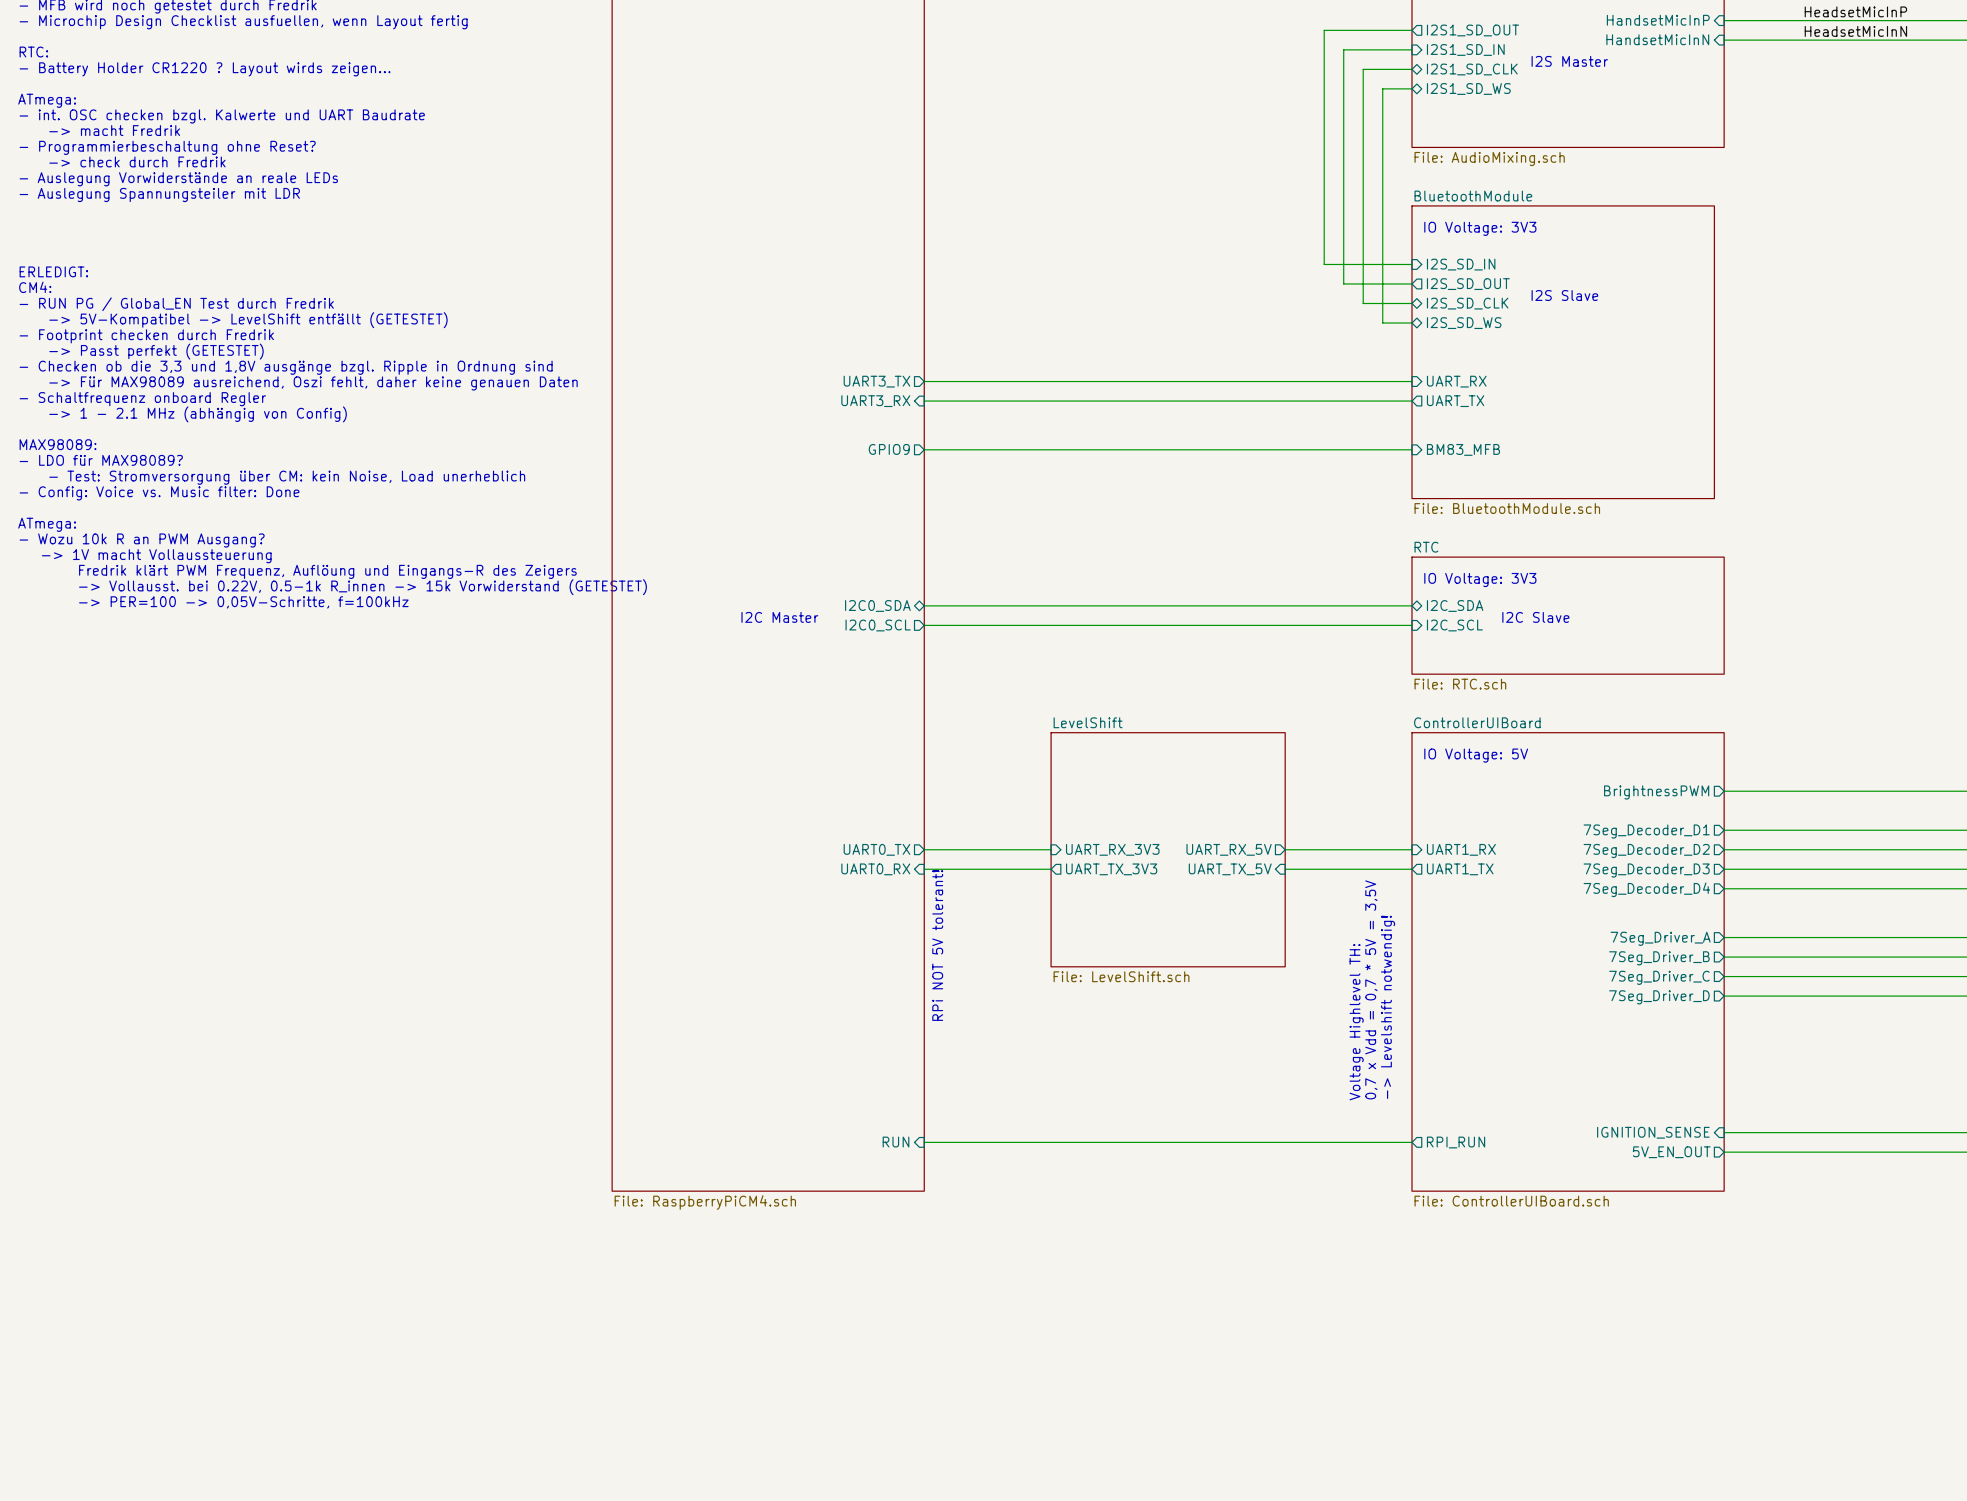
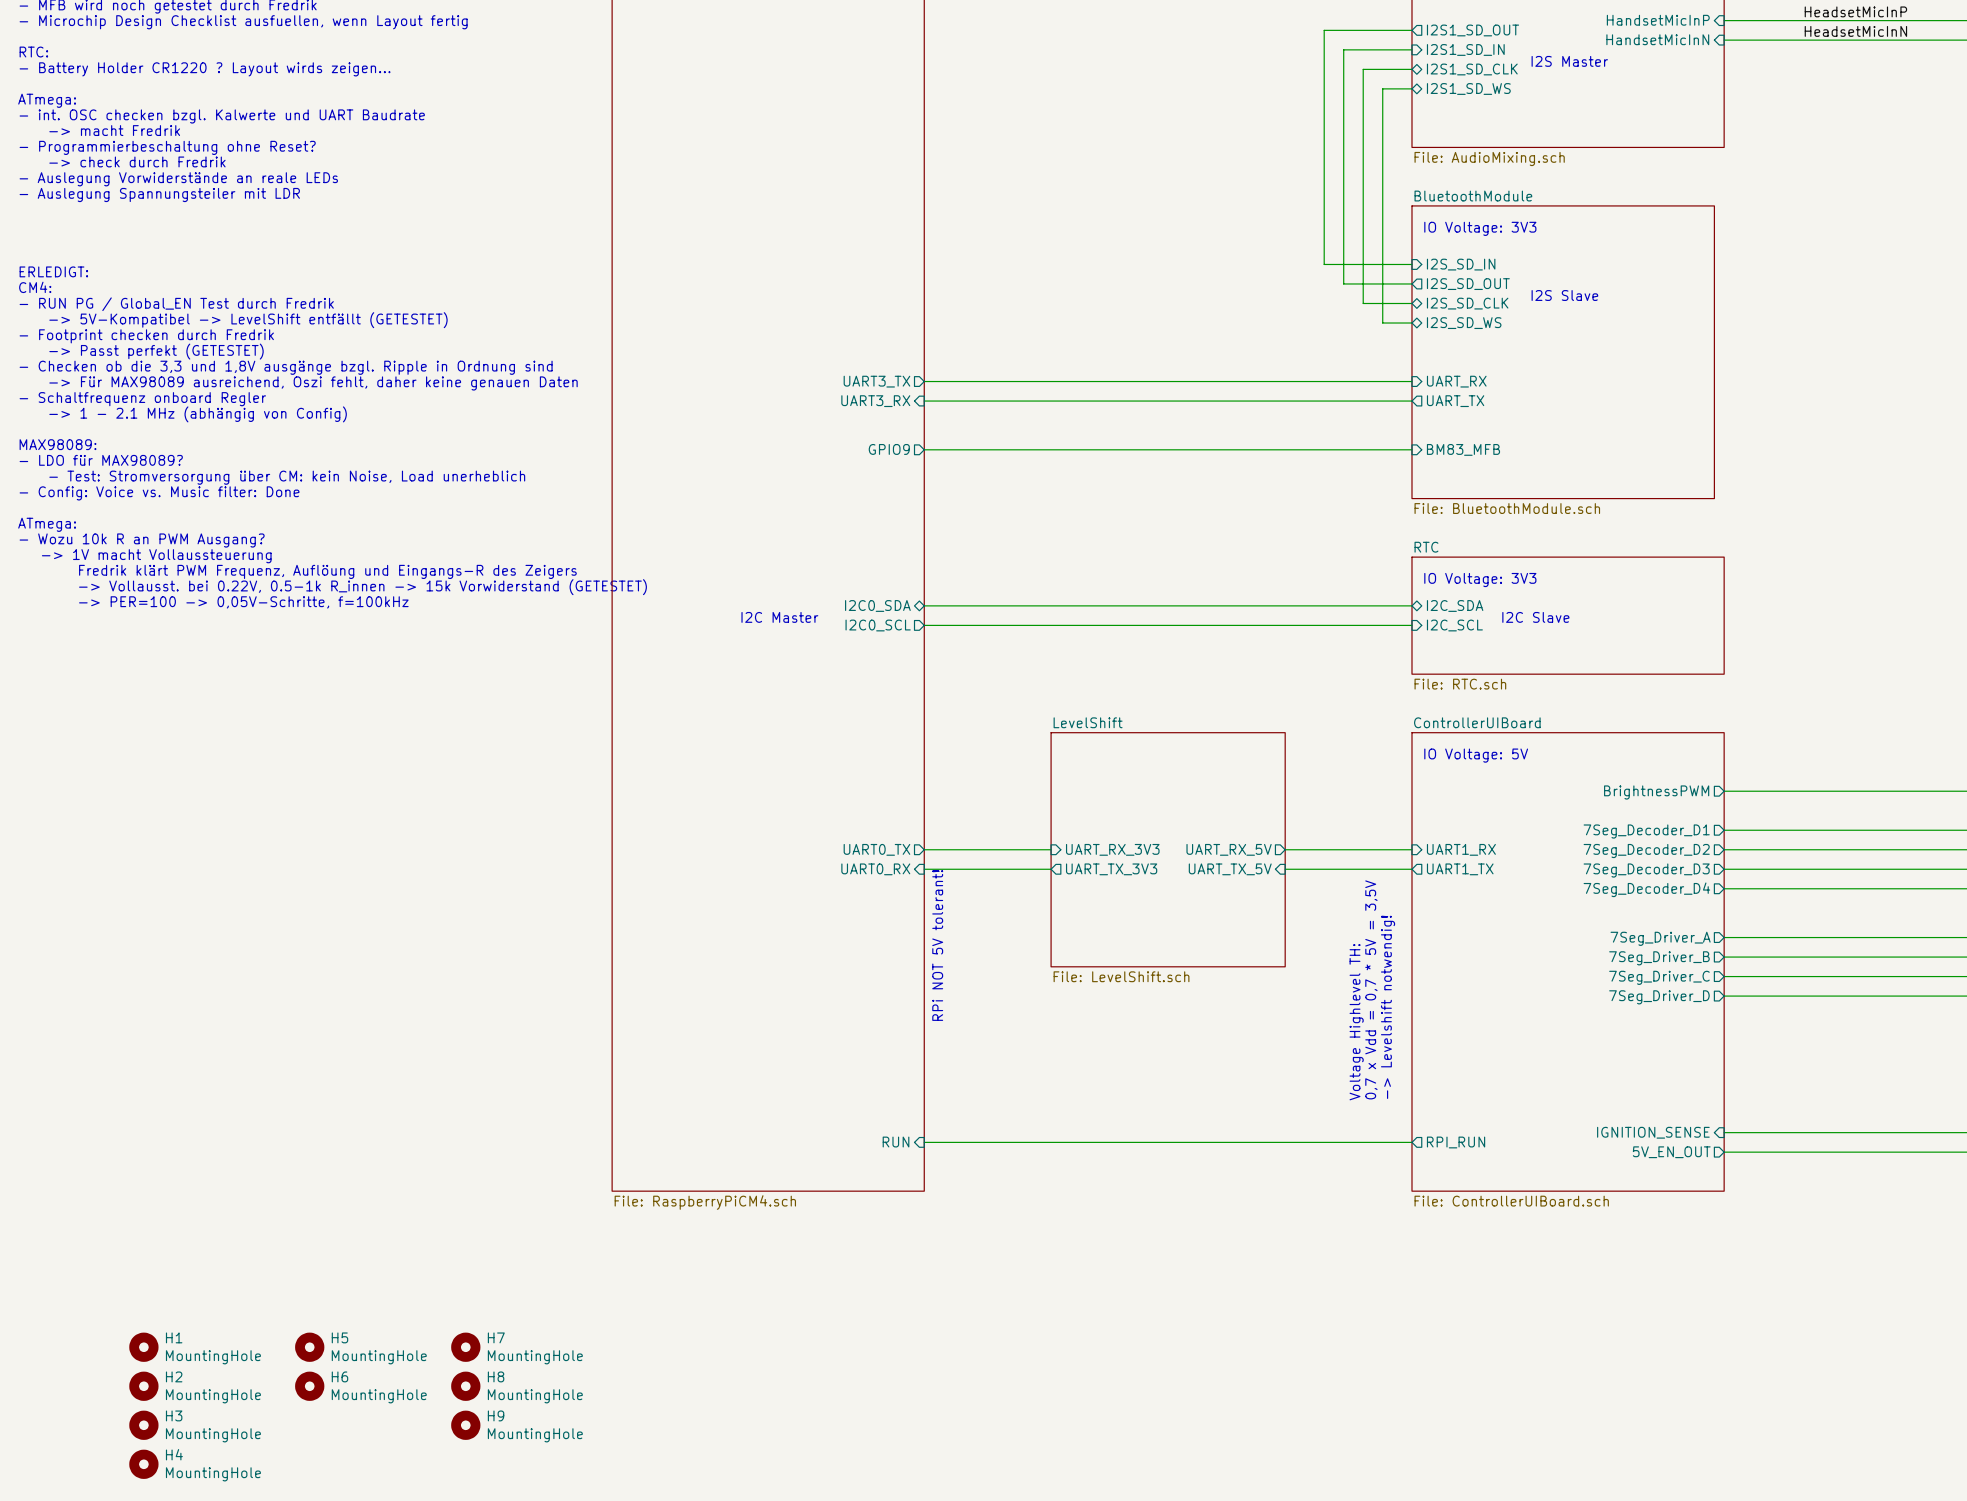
H1: none -> MountingHole (143, 1347)
H5: none -> MountingHole (309, 1347)
H7: none -> MountingHole (465, 1347)
H2: none -> MountingHole (143, 1386)
H6: none -> MountingHole (309, 1386)
H8: none -> MountingHole (465, 1386)
H3: none -> MountingHole (143, 1425)
H9: none -> MountingHole (465, 1425)
H4: none -> MountingHole (143, 1464)

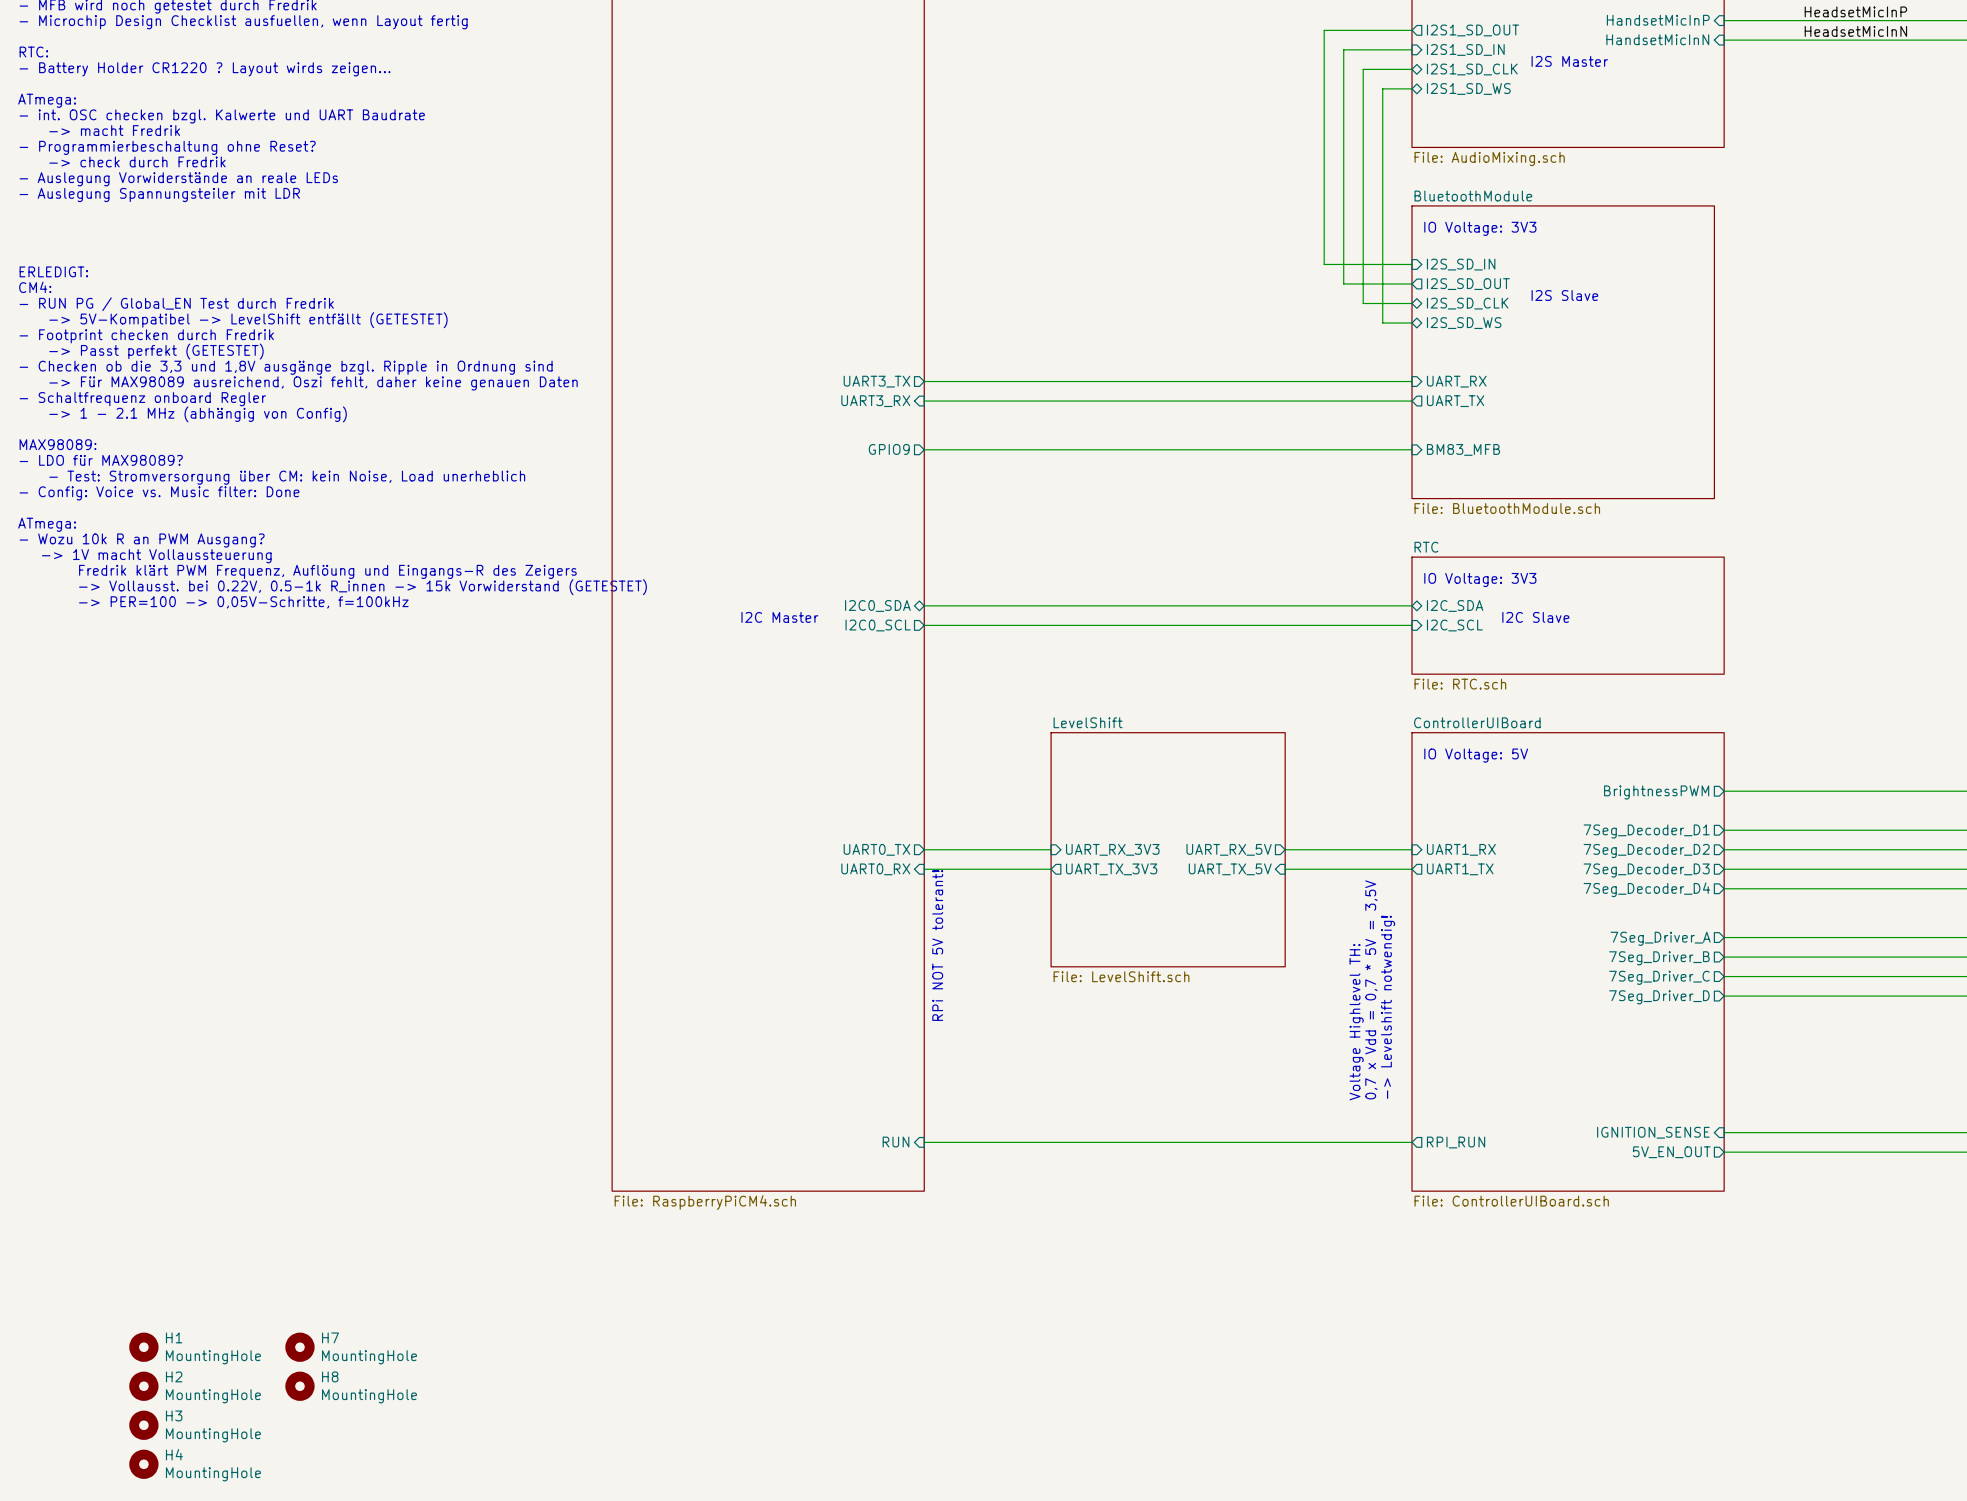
H5: MountingHole (309, 1347) -> none
H7 position: (465, 1347) -> (299, 1347)
H6: MountingHole (309, 1386) -> none
H8 position: (465, 1386) -> (299, 1386)
H9: MountingHole (465, 1425) -> none

